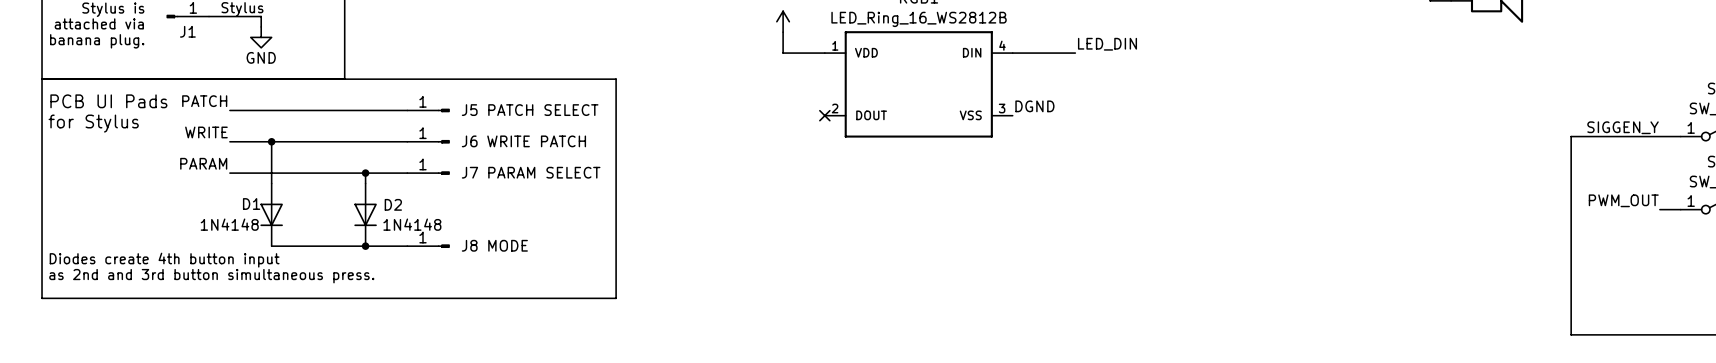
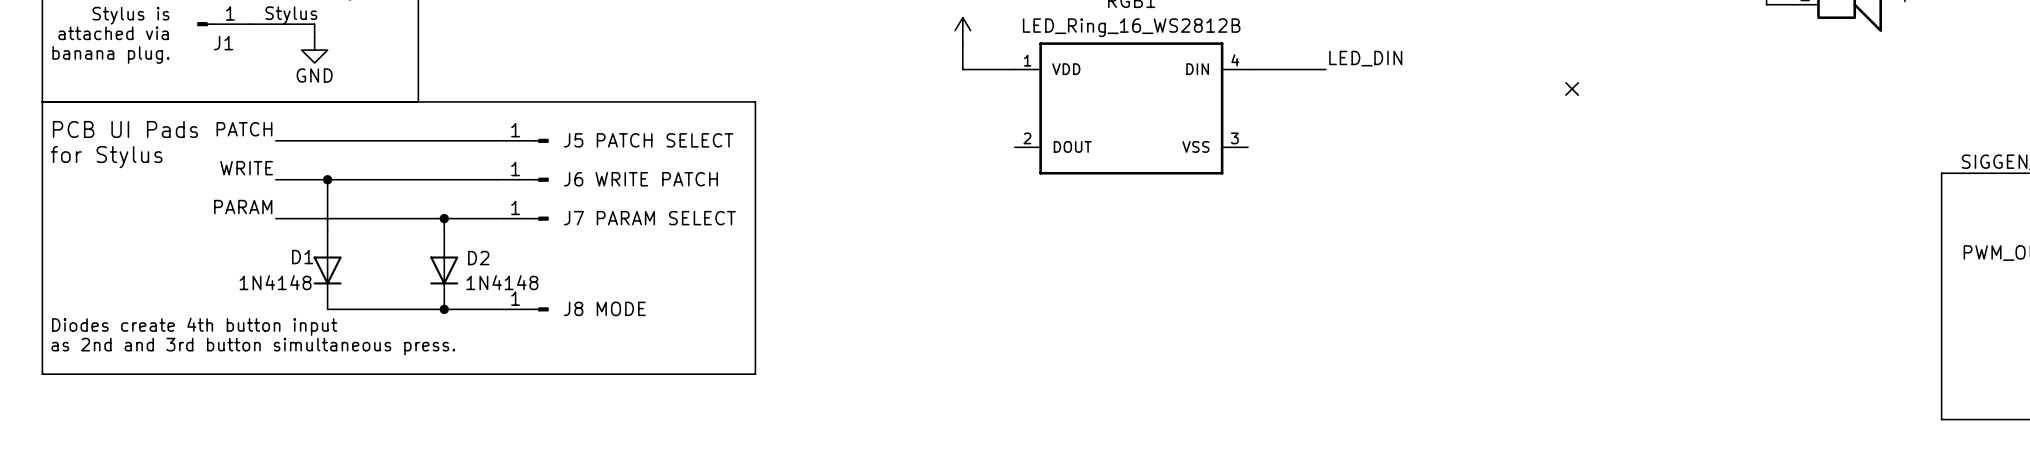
no-connect mark: none -> (1572, 88)
label: DGND (1034, 106) -> none
no-connect mark: (824, 115) -> none

